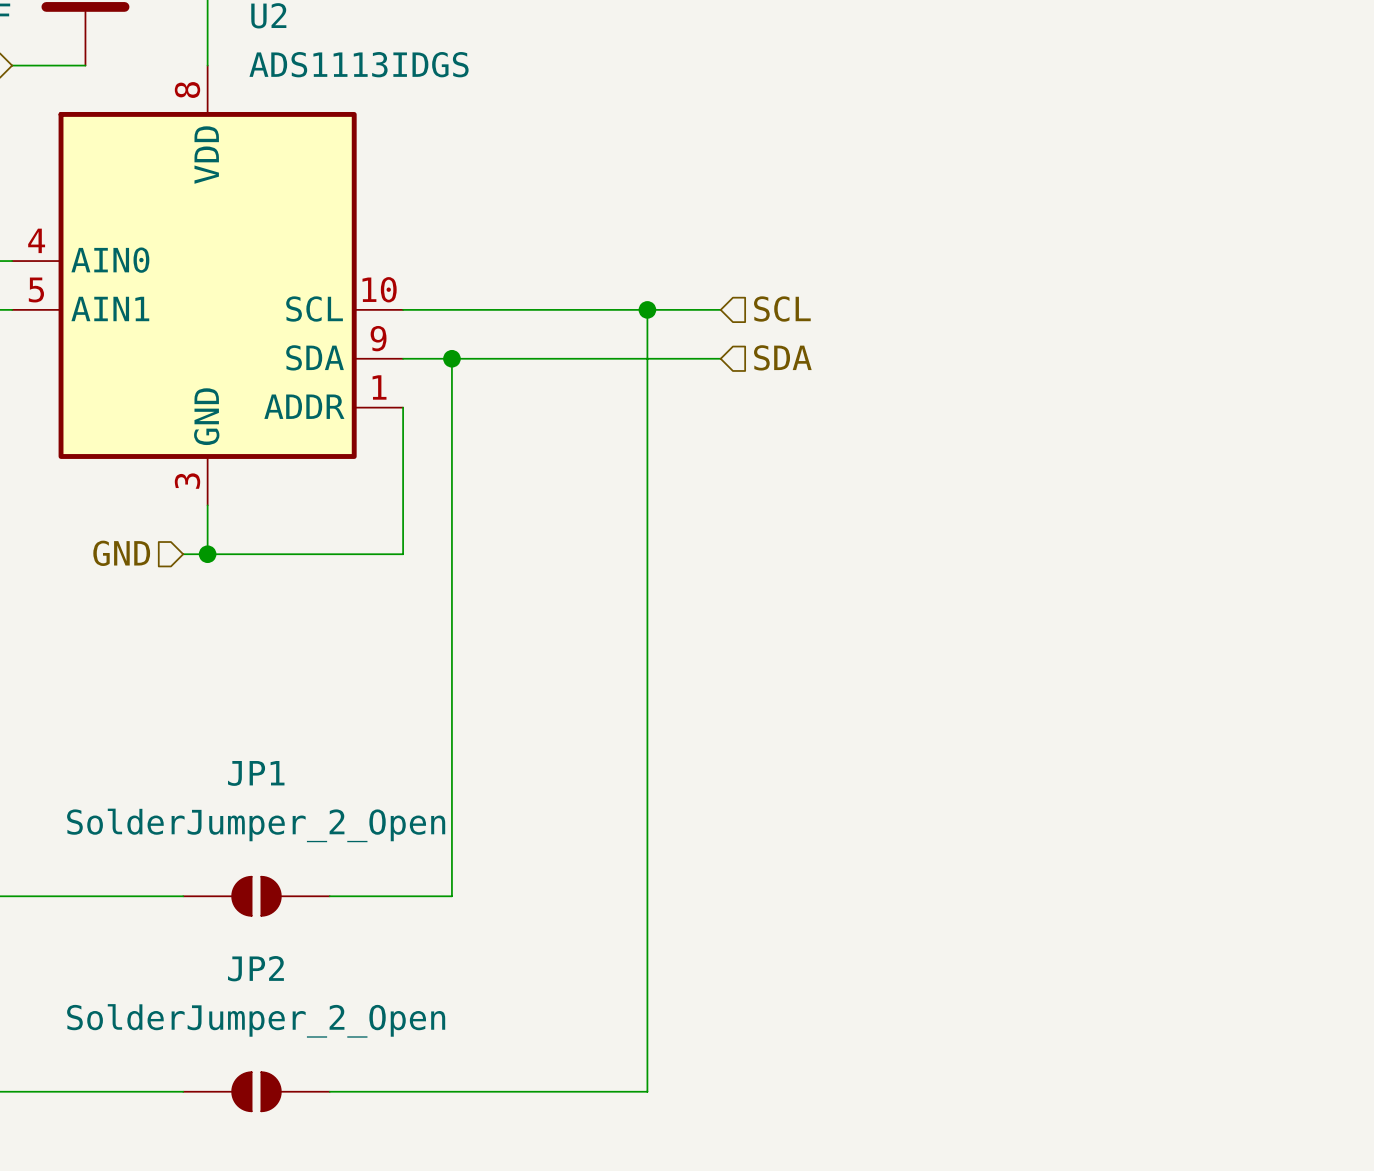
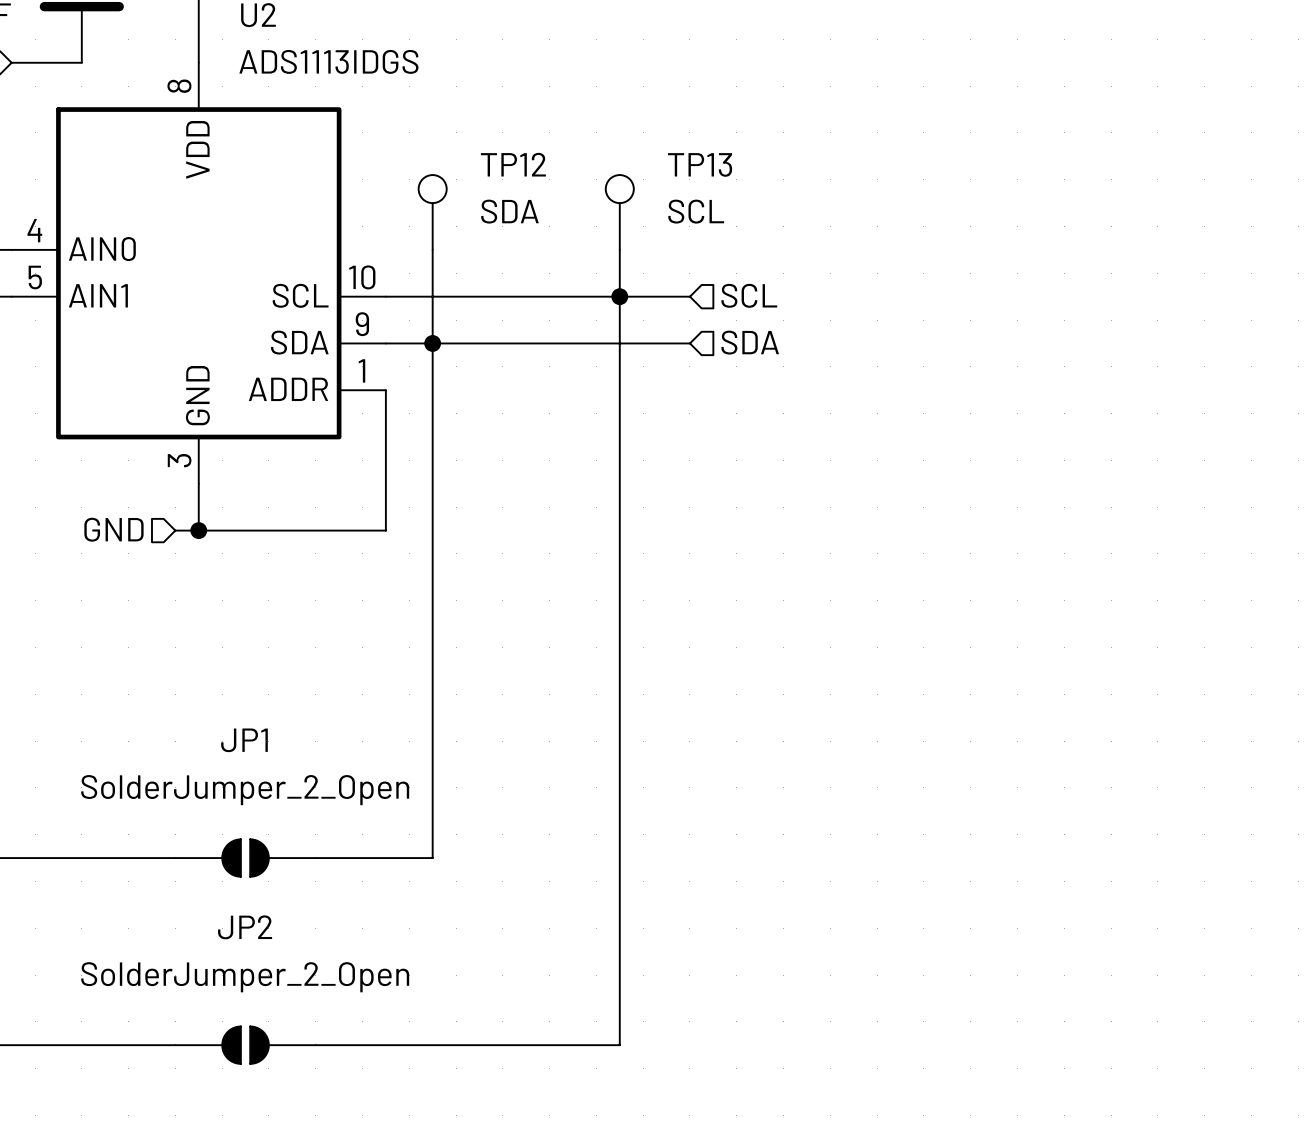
TP12: none -> SDA (432, 212)
TP13: none -> SCL (619, 212)
wire: none -> (432, 249) (432, 343)
wire: none -> (619, 249) (619, 296)

